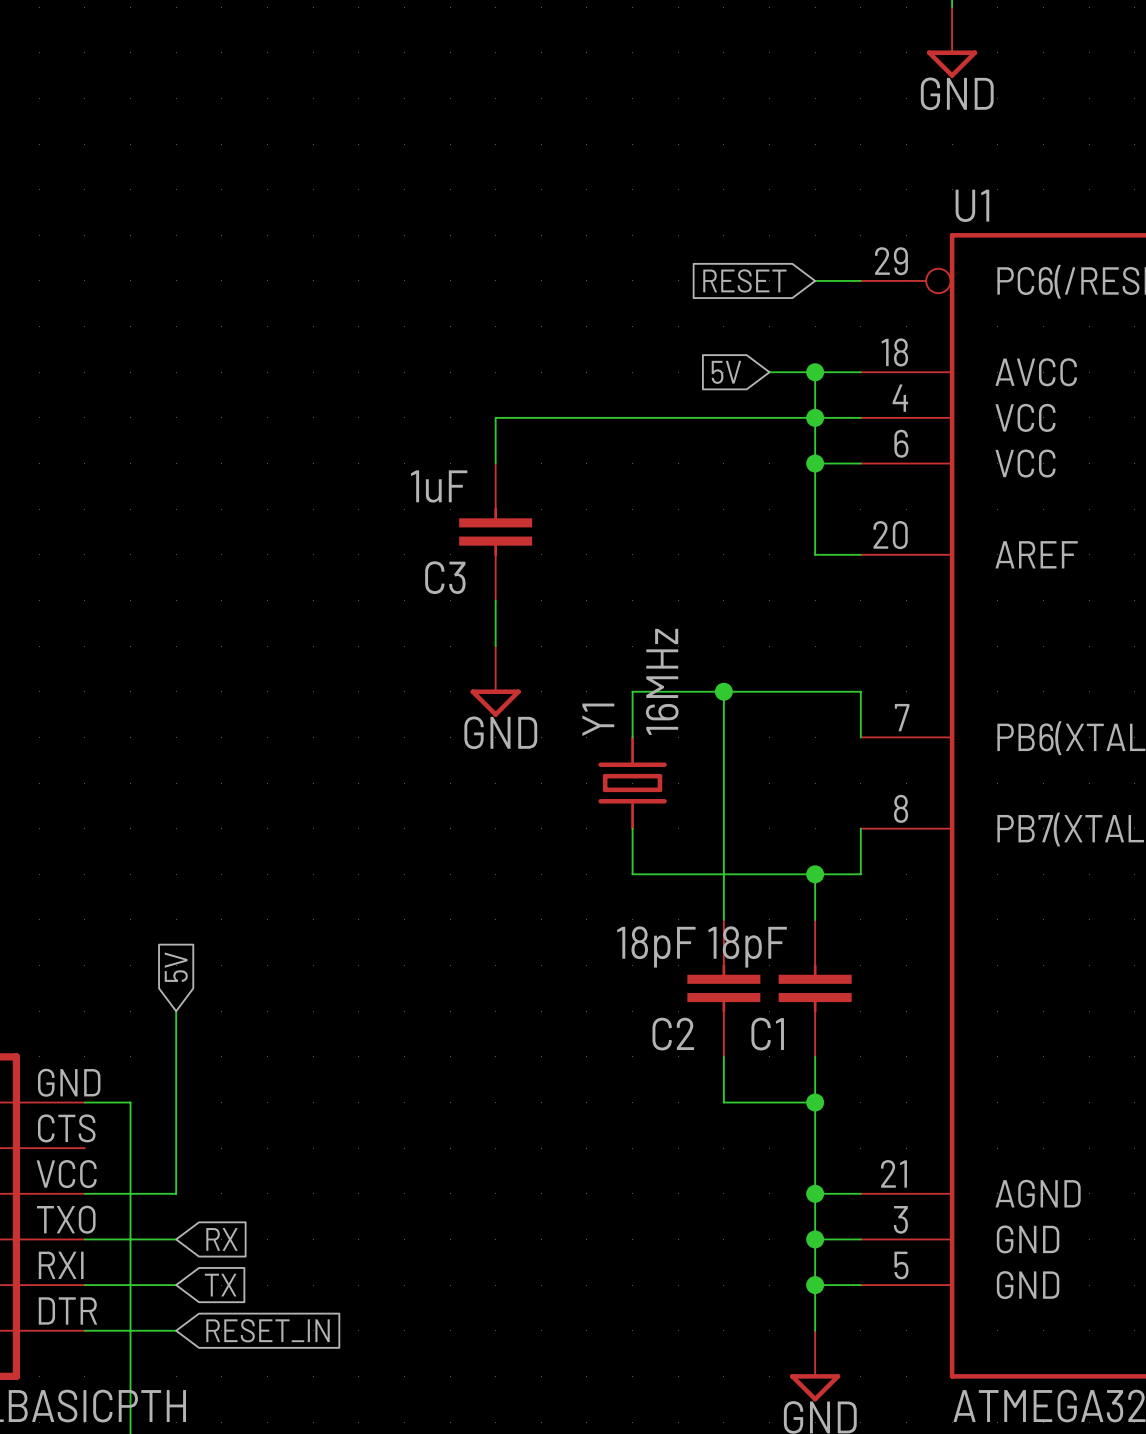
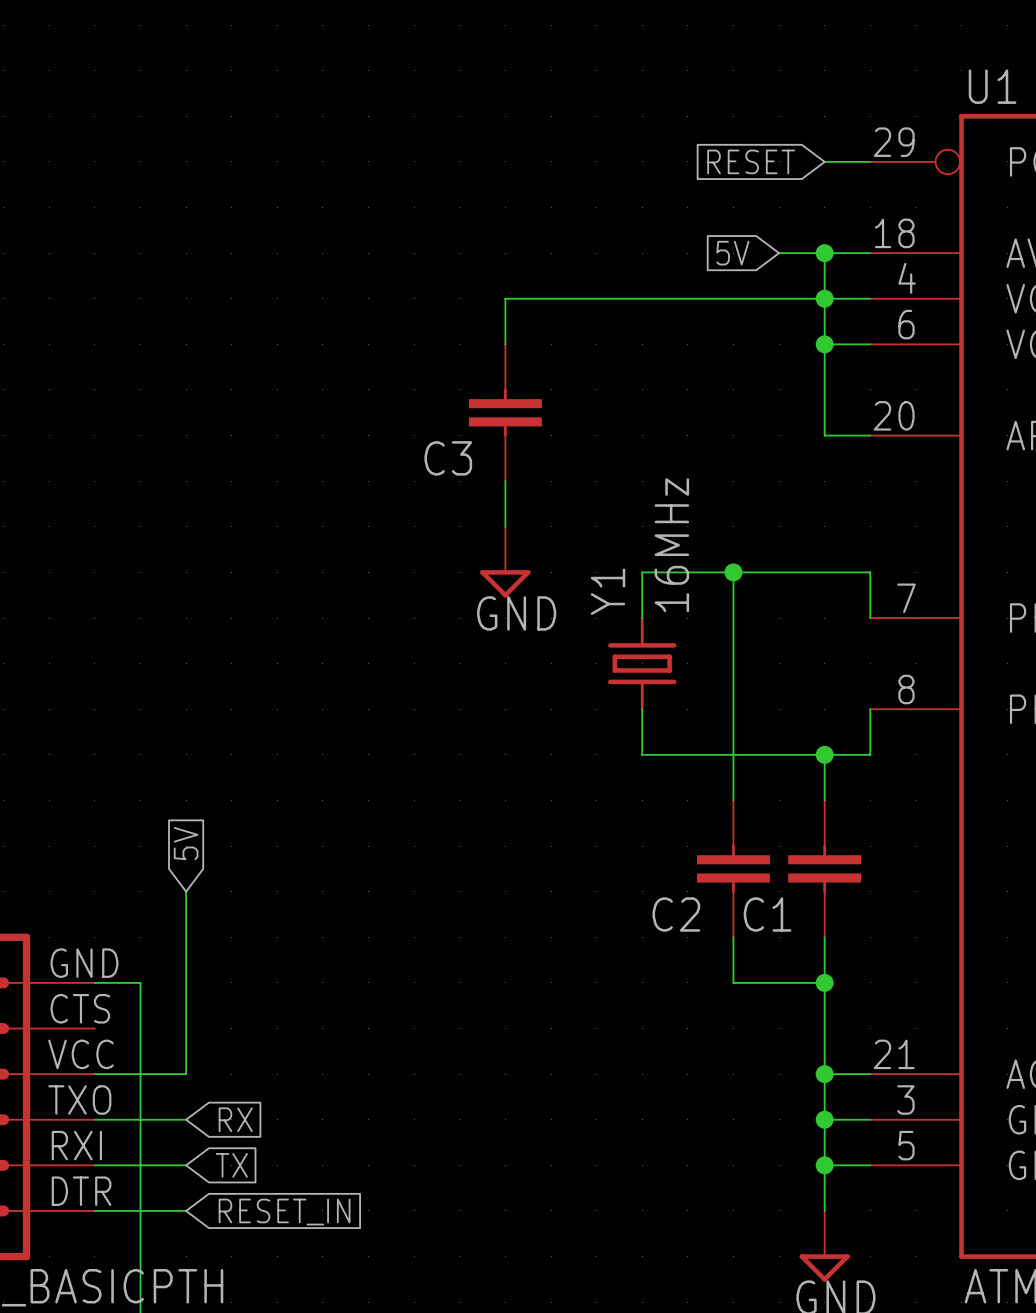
C3 value: 1uF (439, 486) -> none
C2 value: 18pF (656, 946) -> none
C1 value: 18pF (747, 946) -> none

